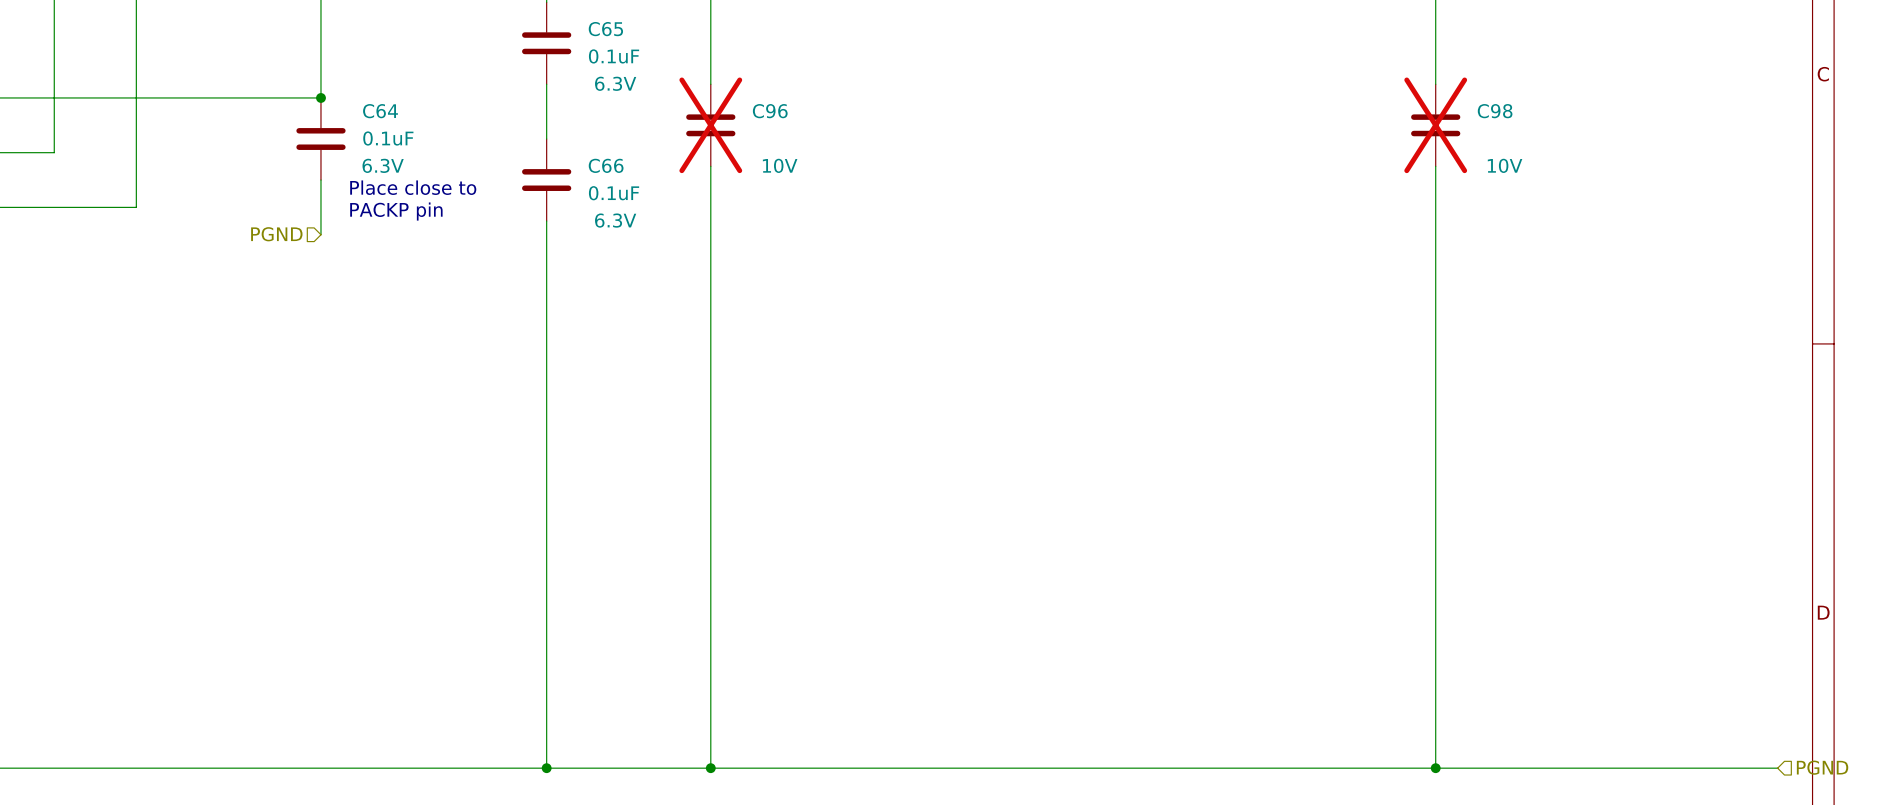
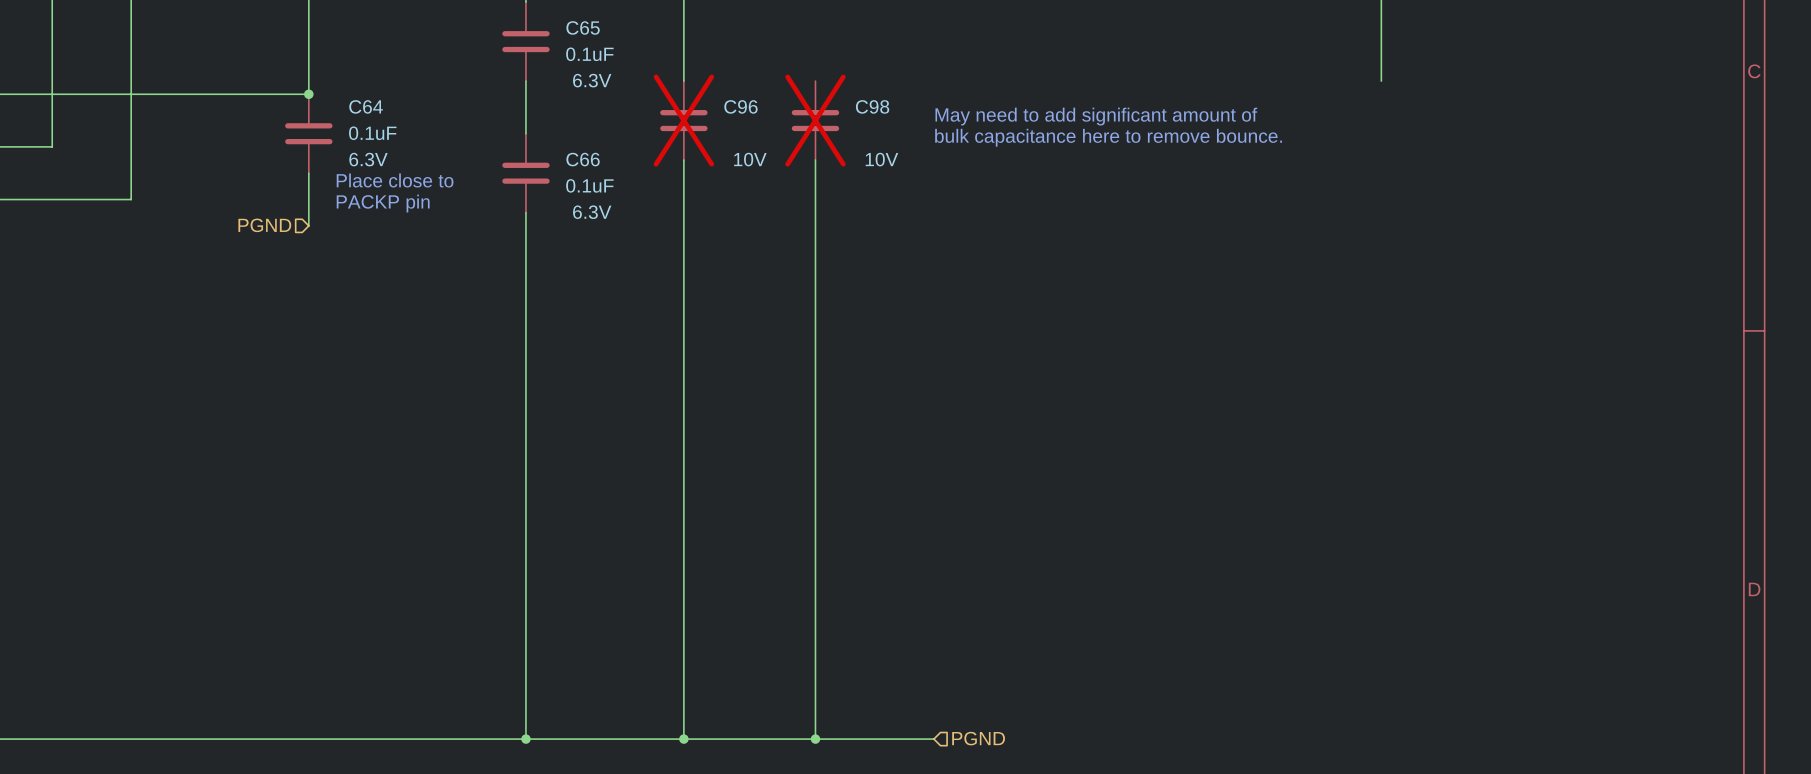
text: none -> May need to add significant amount of (1096, 116)
C98 position: (1435, 125) -> (815, 120)
text: none -> bulk capacitance here to remove bounce. (1108, 137)
wire: none -> (815, 160) (815, 739)
wire: (1435, 166) (1435, 768) -> none
hierarchical label: none -> PGND (978, 738)
hierarchical label: PGND (1822, 767) -> none
junction: none -> (815, 739)
wire: (970, 768) (1777, 768) -> none
junction: (1435, 768) -> none

